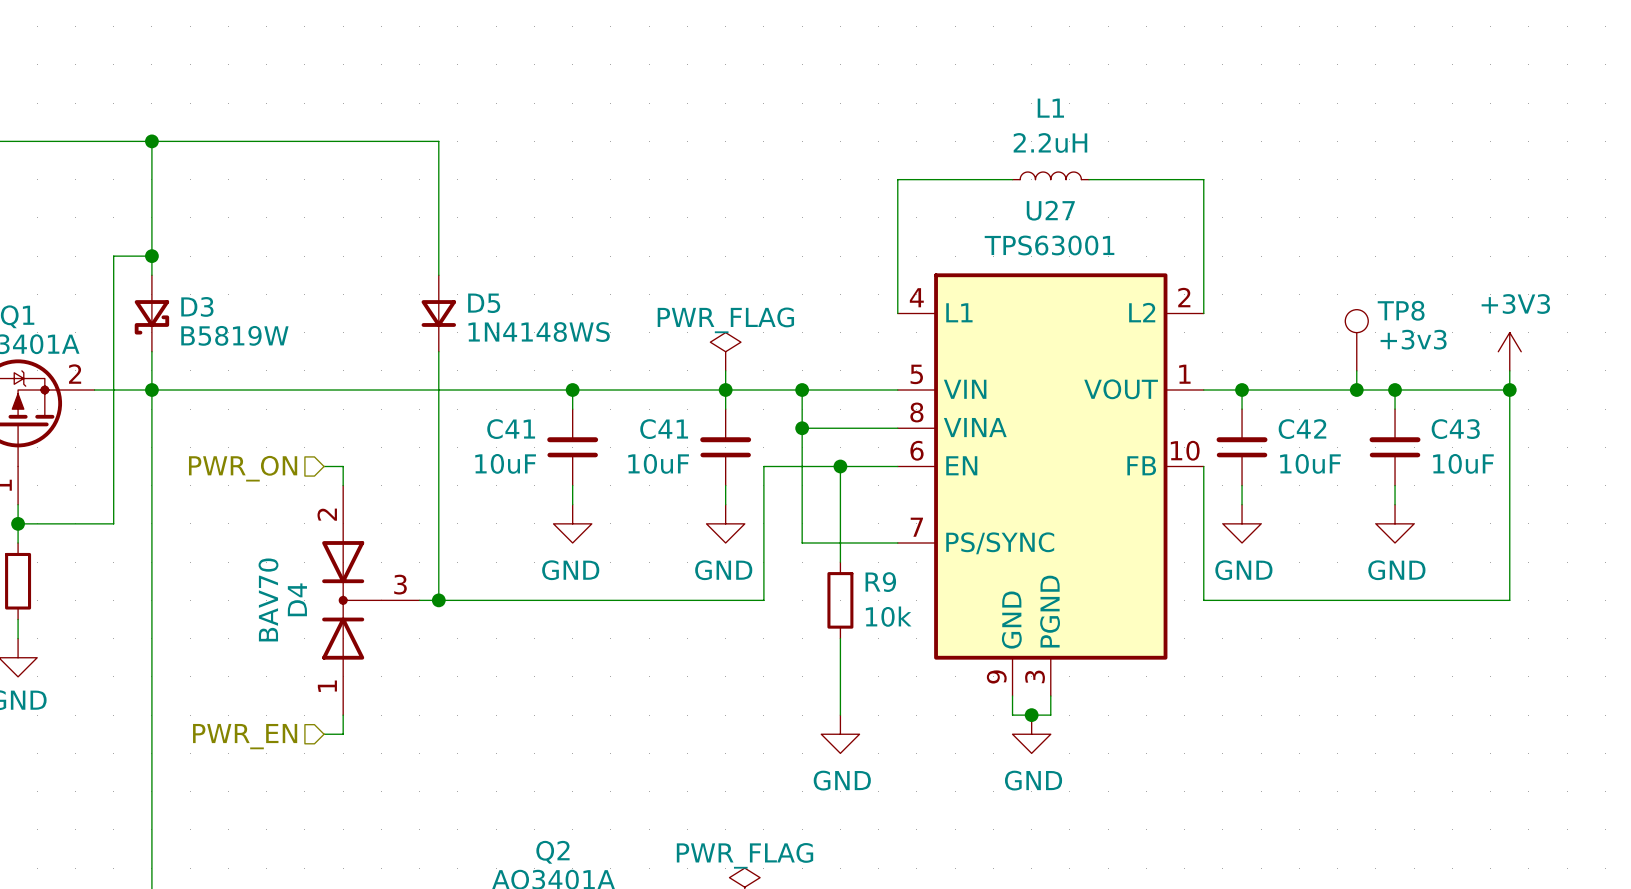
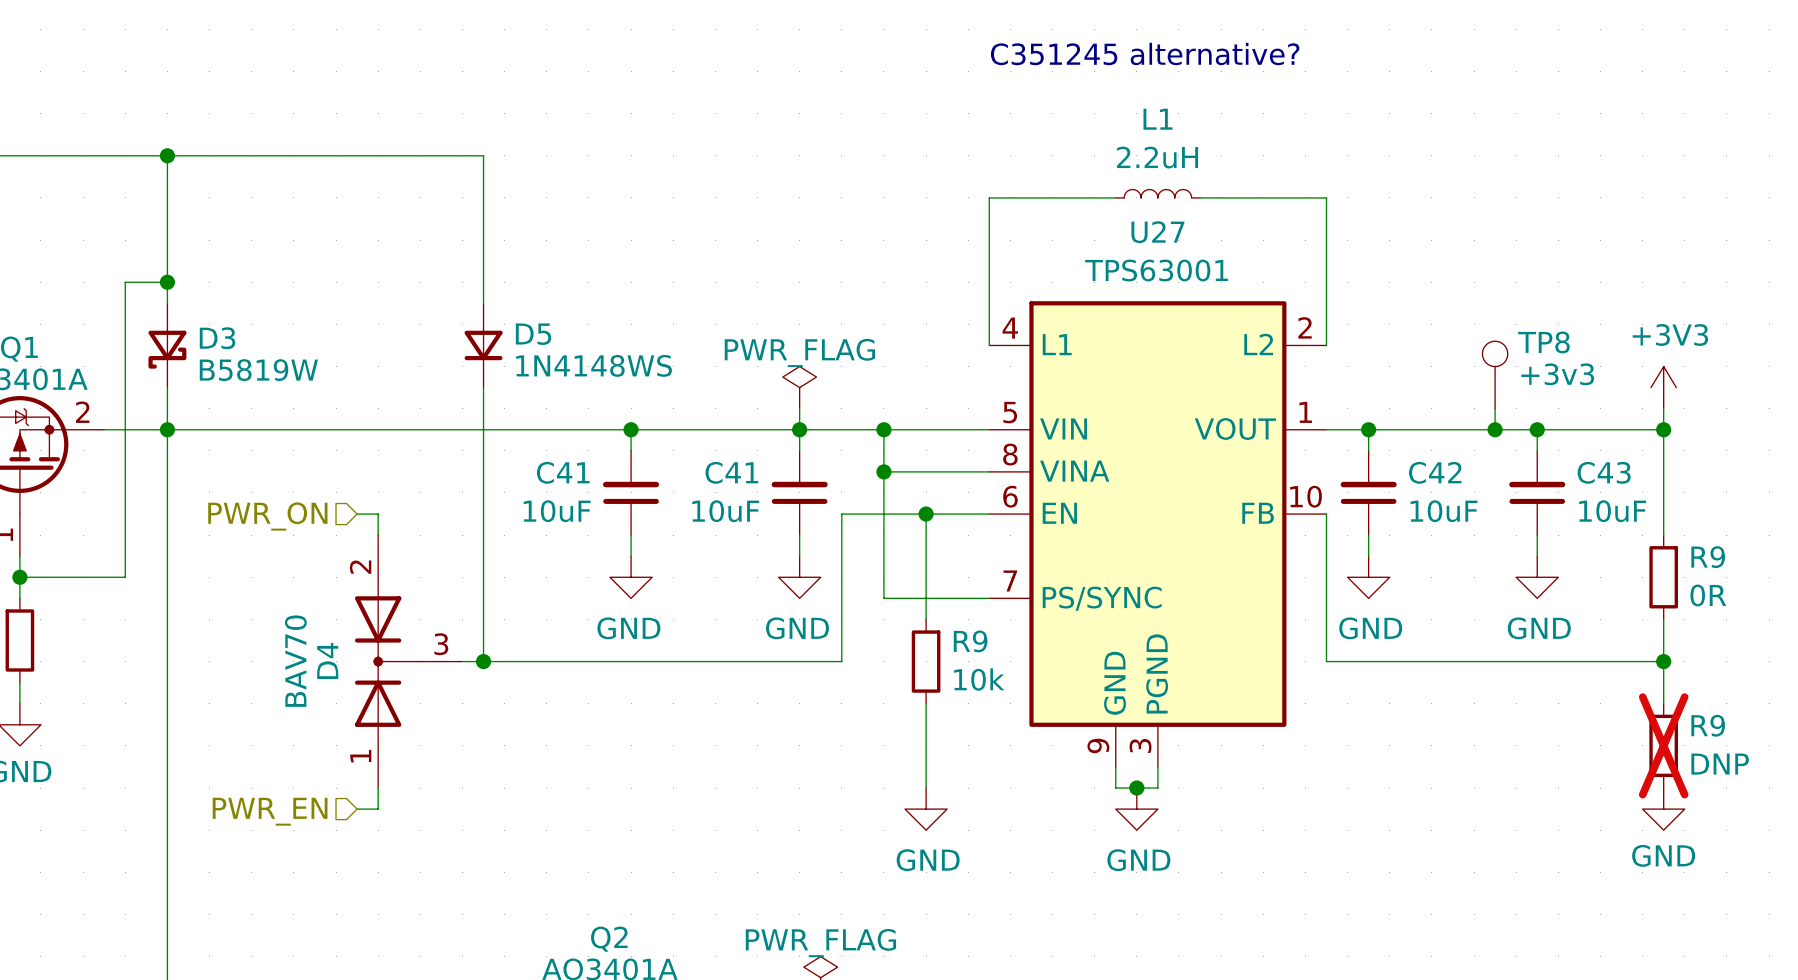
text: none -> C351245 alternative? (1145, 54)
wire: (1509, 485) (1509, 562) -> none
R9: none -> 0R (1663, 577)
wire: none -> (1663, 661) (1663, 703)
junction: none -> (1663, 661)
R9: none -> DNP (1663, 745)
power symbol: none -> GND (1663, 809)

